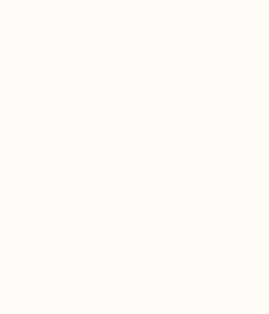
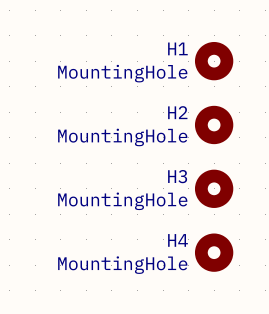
H1: none -> MountingHole (214, 61)
H2: none -> MountingHole (214, 124)
H3: none -> MountingHole (214, 188)
H4: none -> MountingHole (214, 252)

